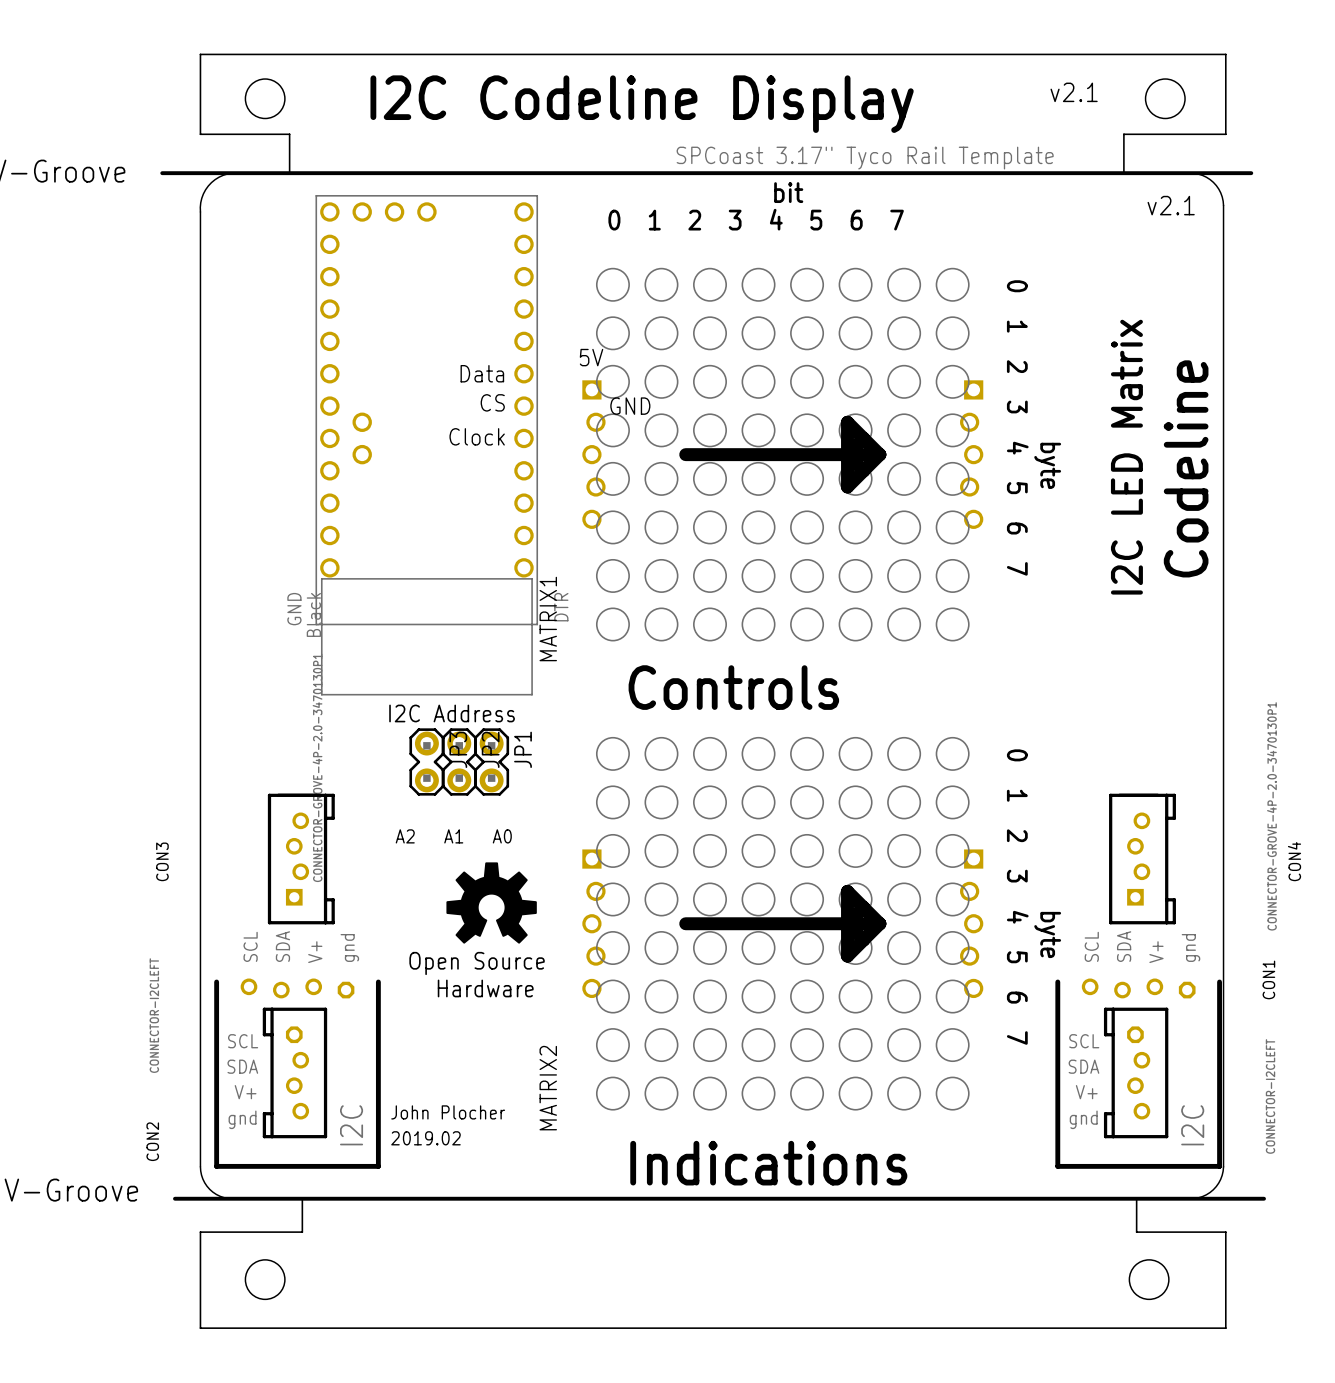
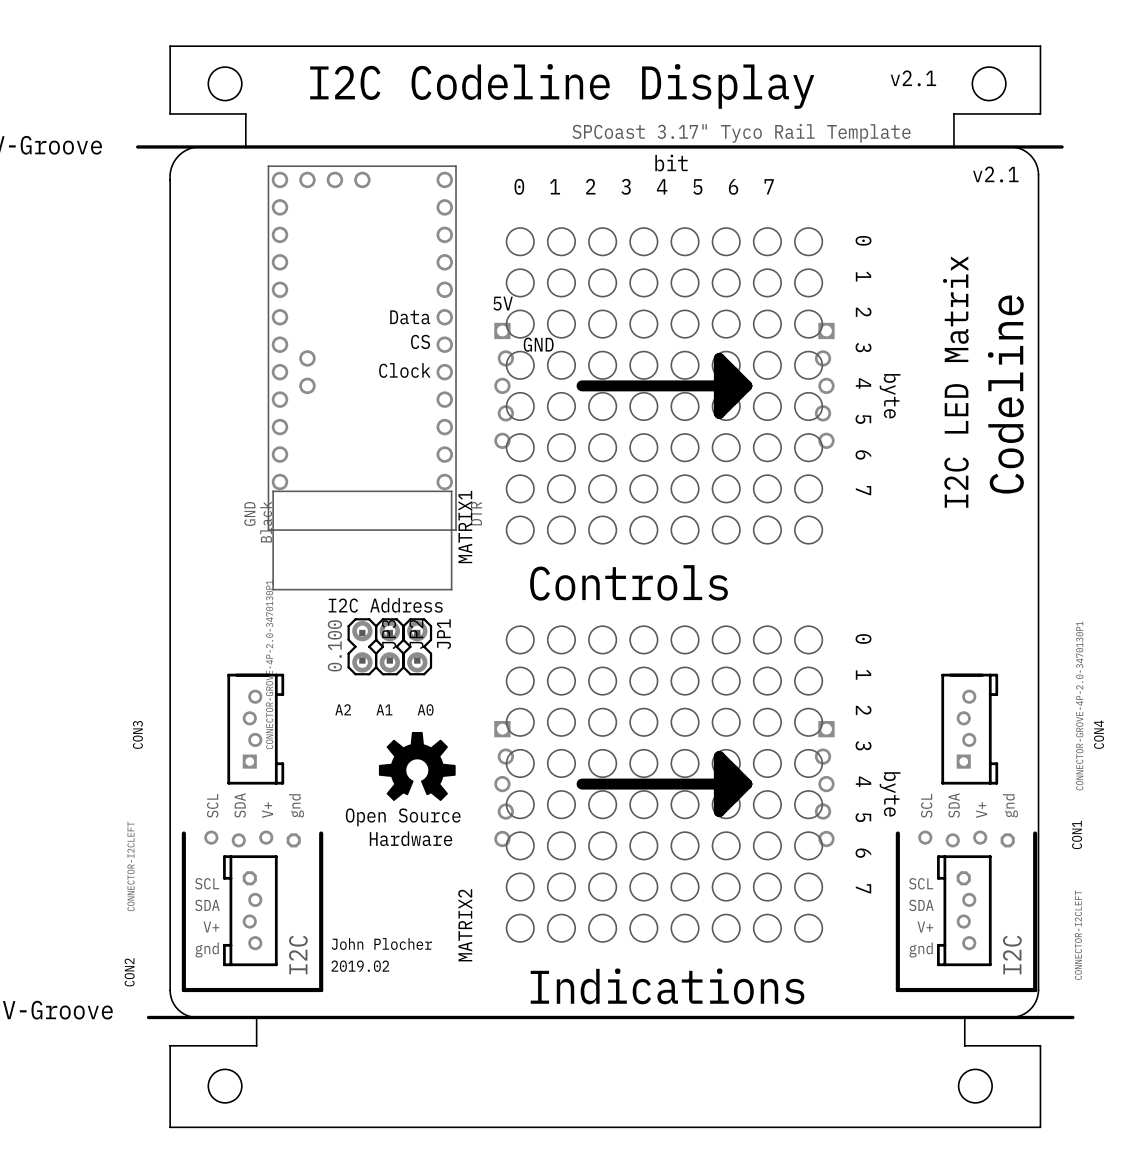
JP3 value: none -> 0.100 (334, 645)

